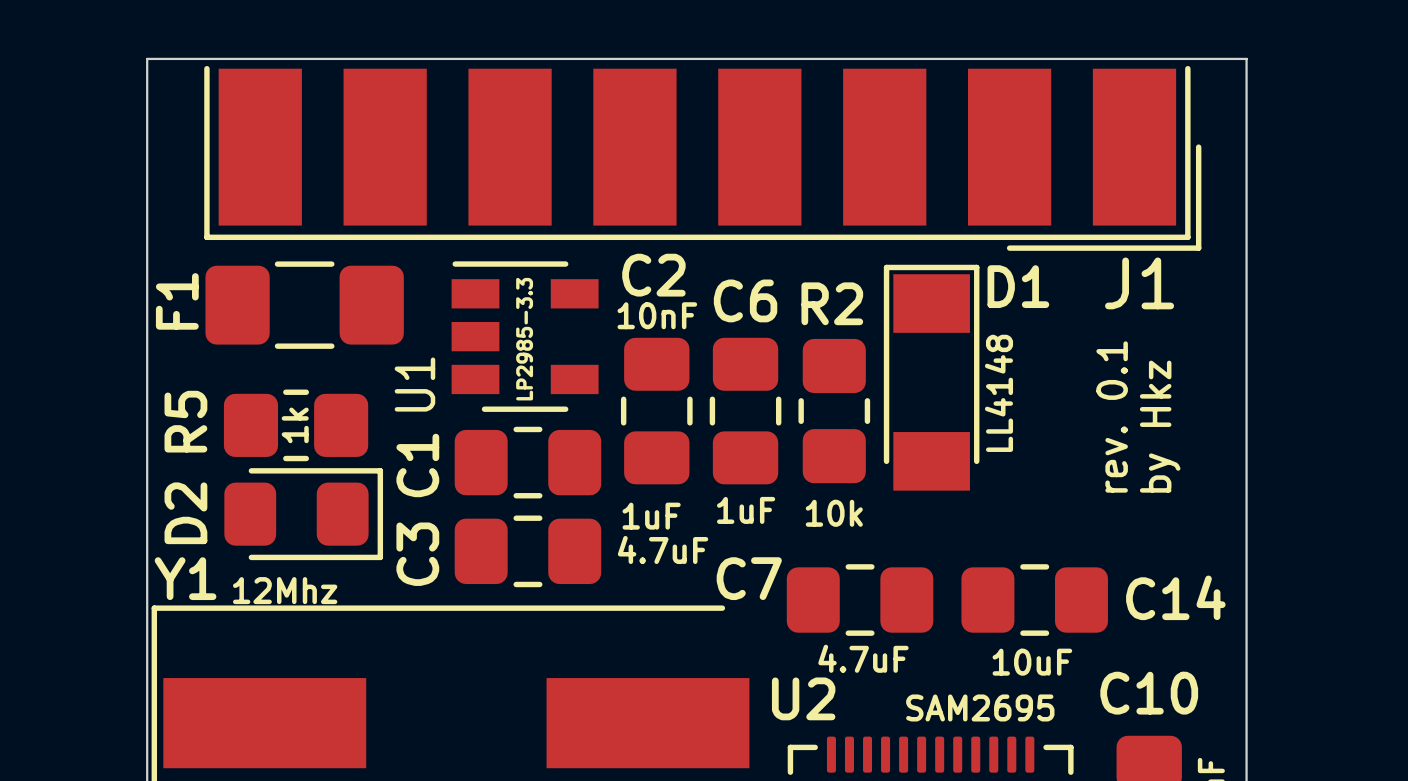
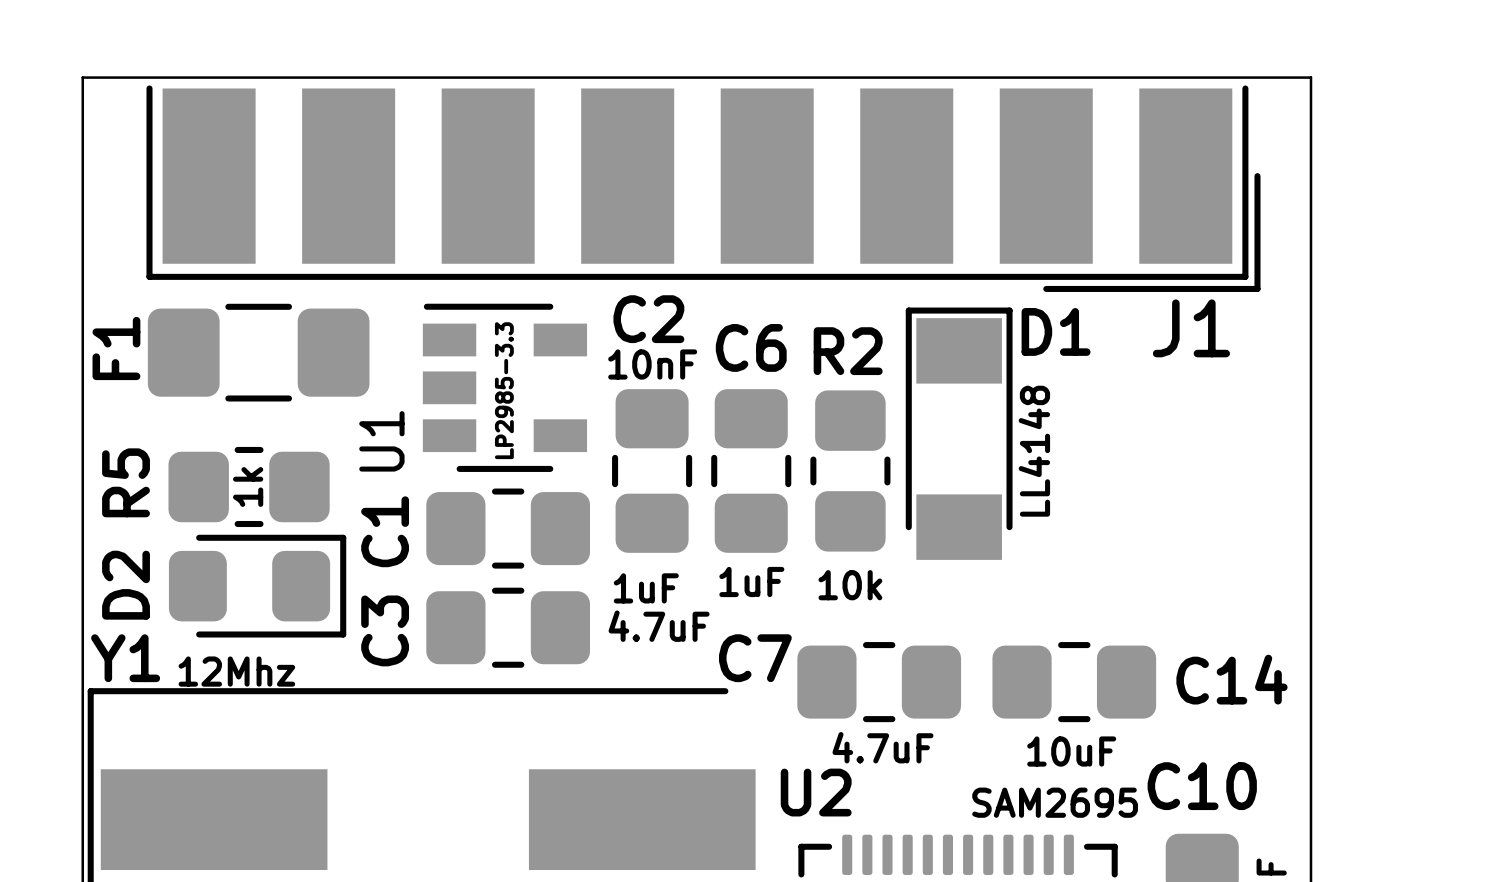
text: rev. 0.1 (1112, 416) -> none
text: by Hkz (1160, 426) -> none
U2 value position: SAM2695 (980, 707) -> SAM2695 (1055, 802)

